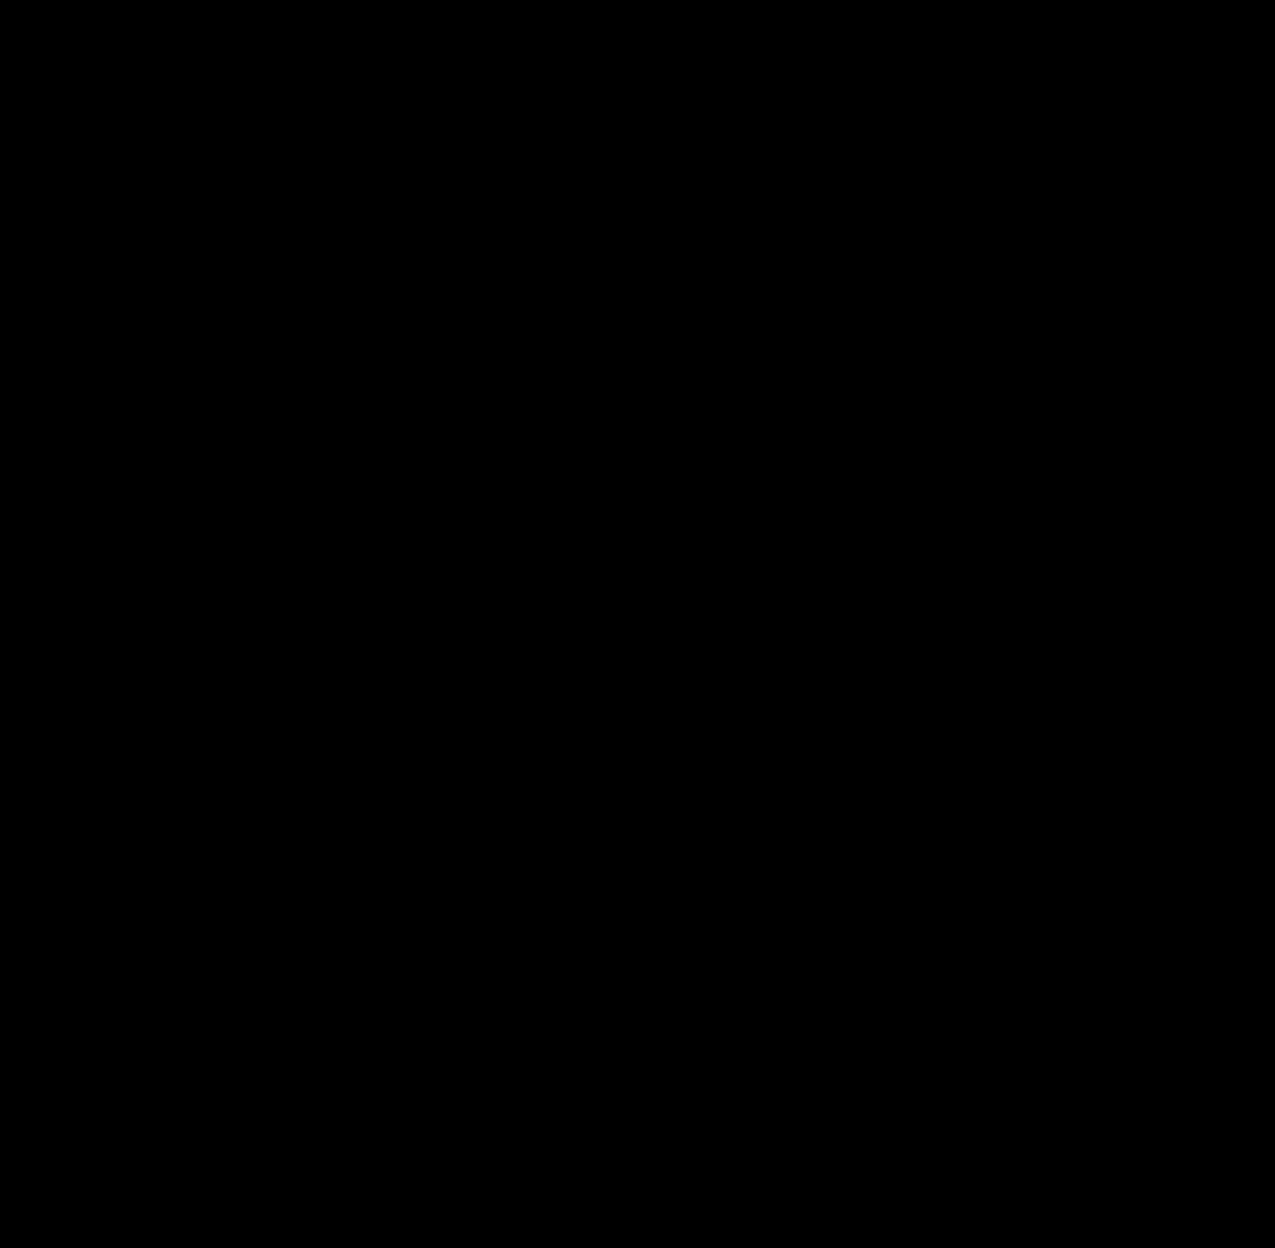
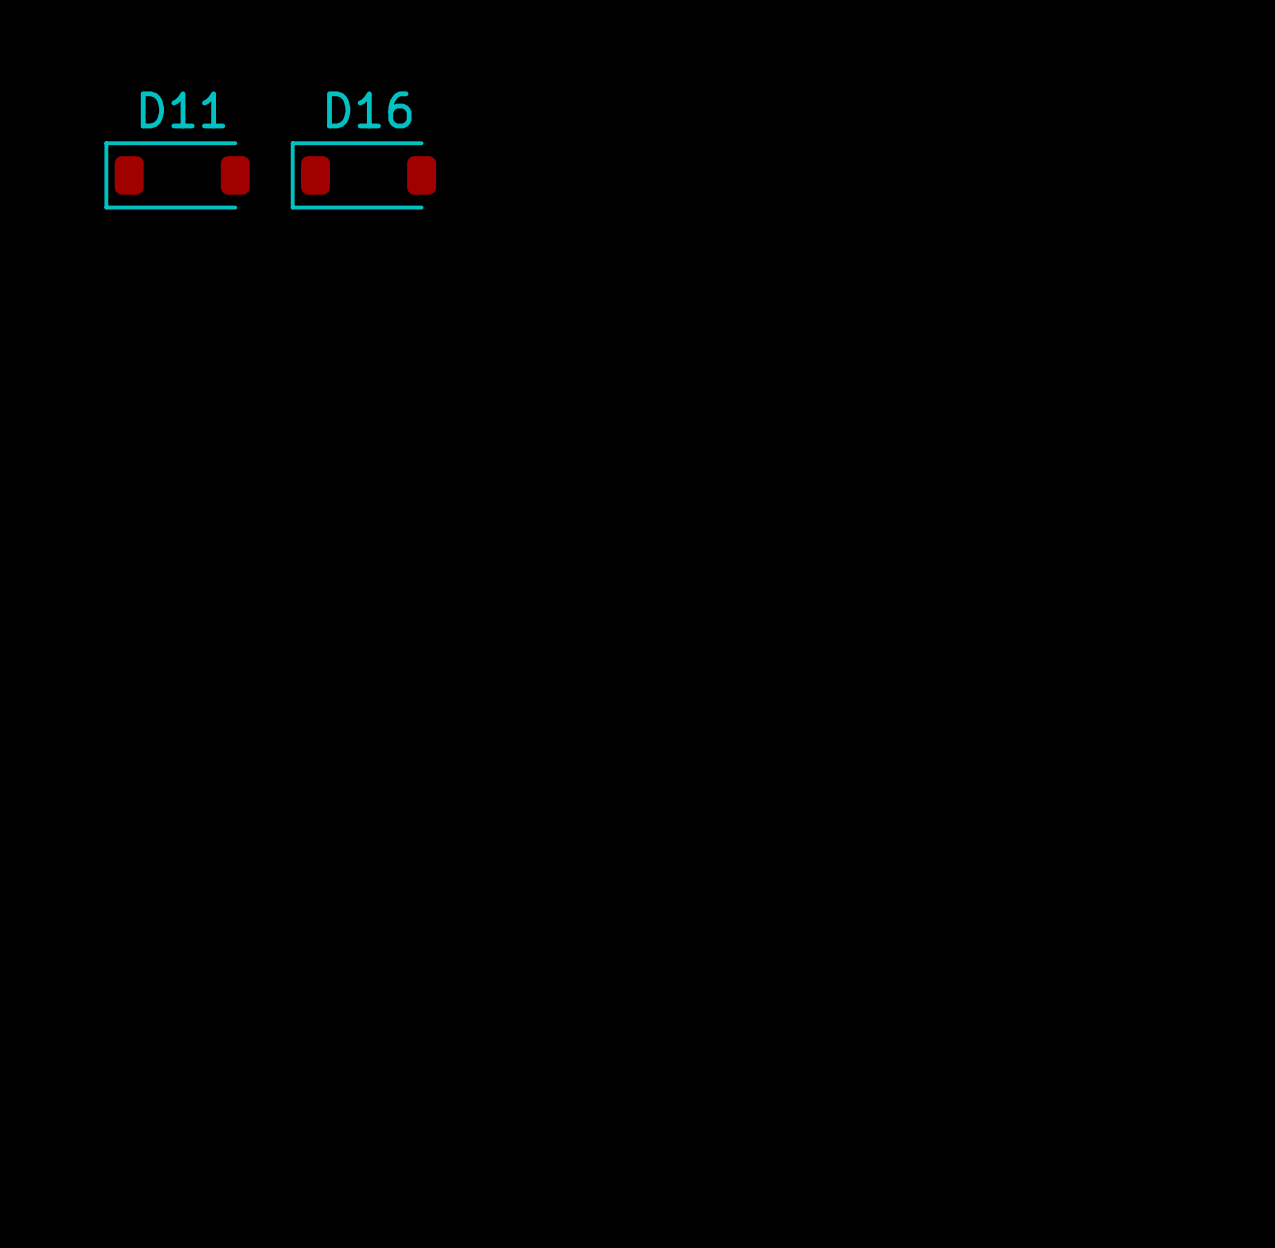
D11: none -> (177, 175)
D16: none -> (363, 175)

